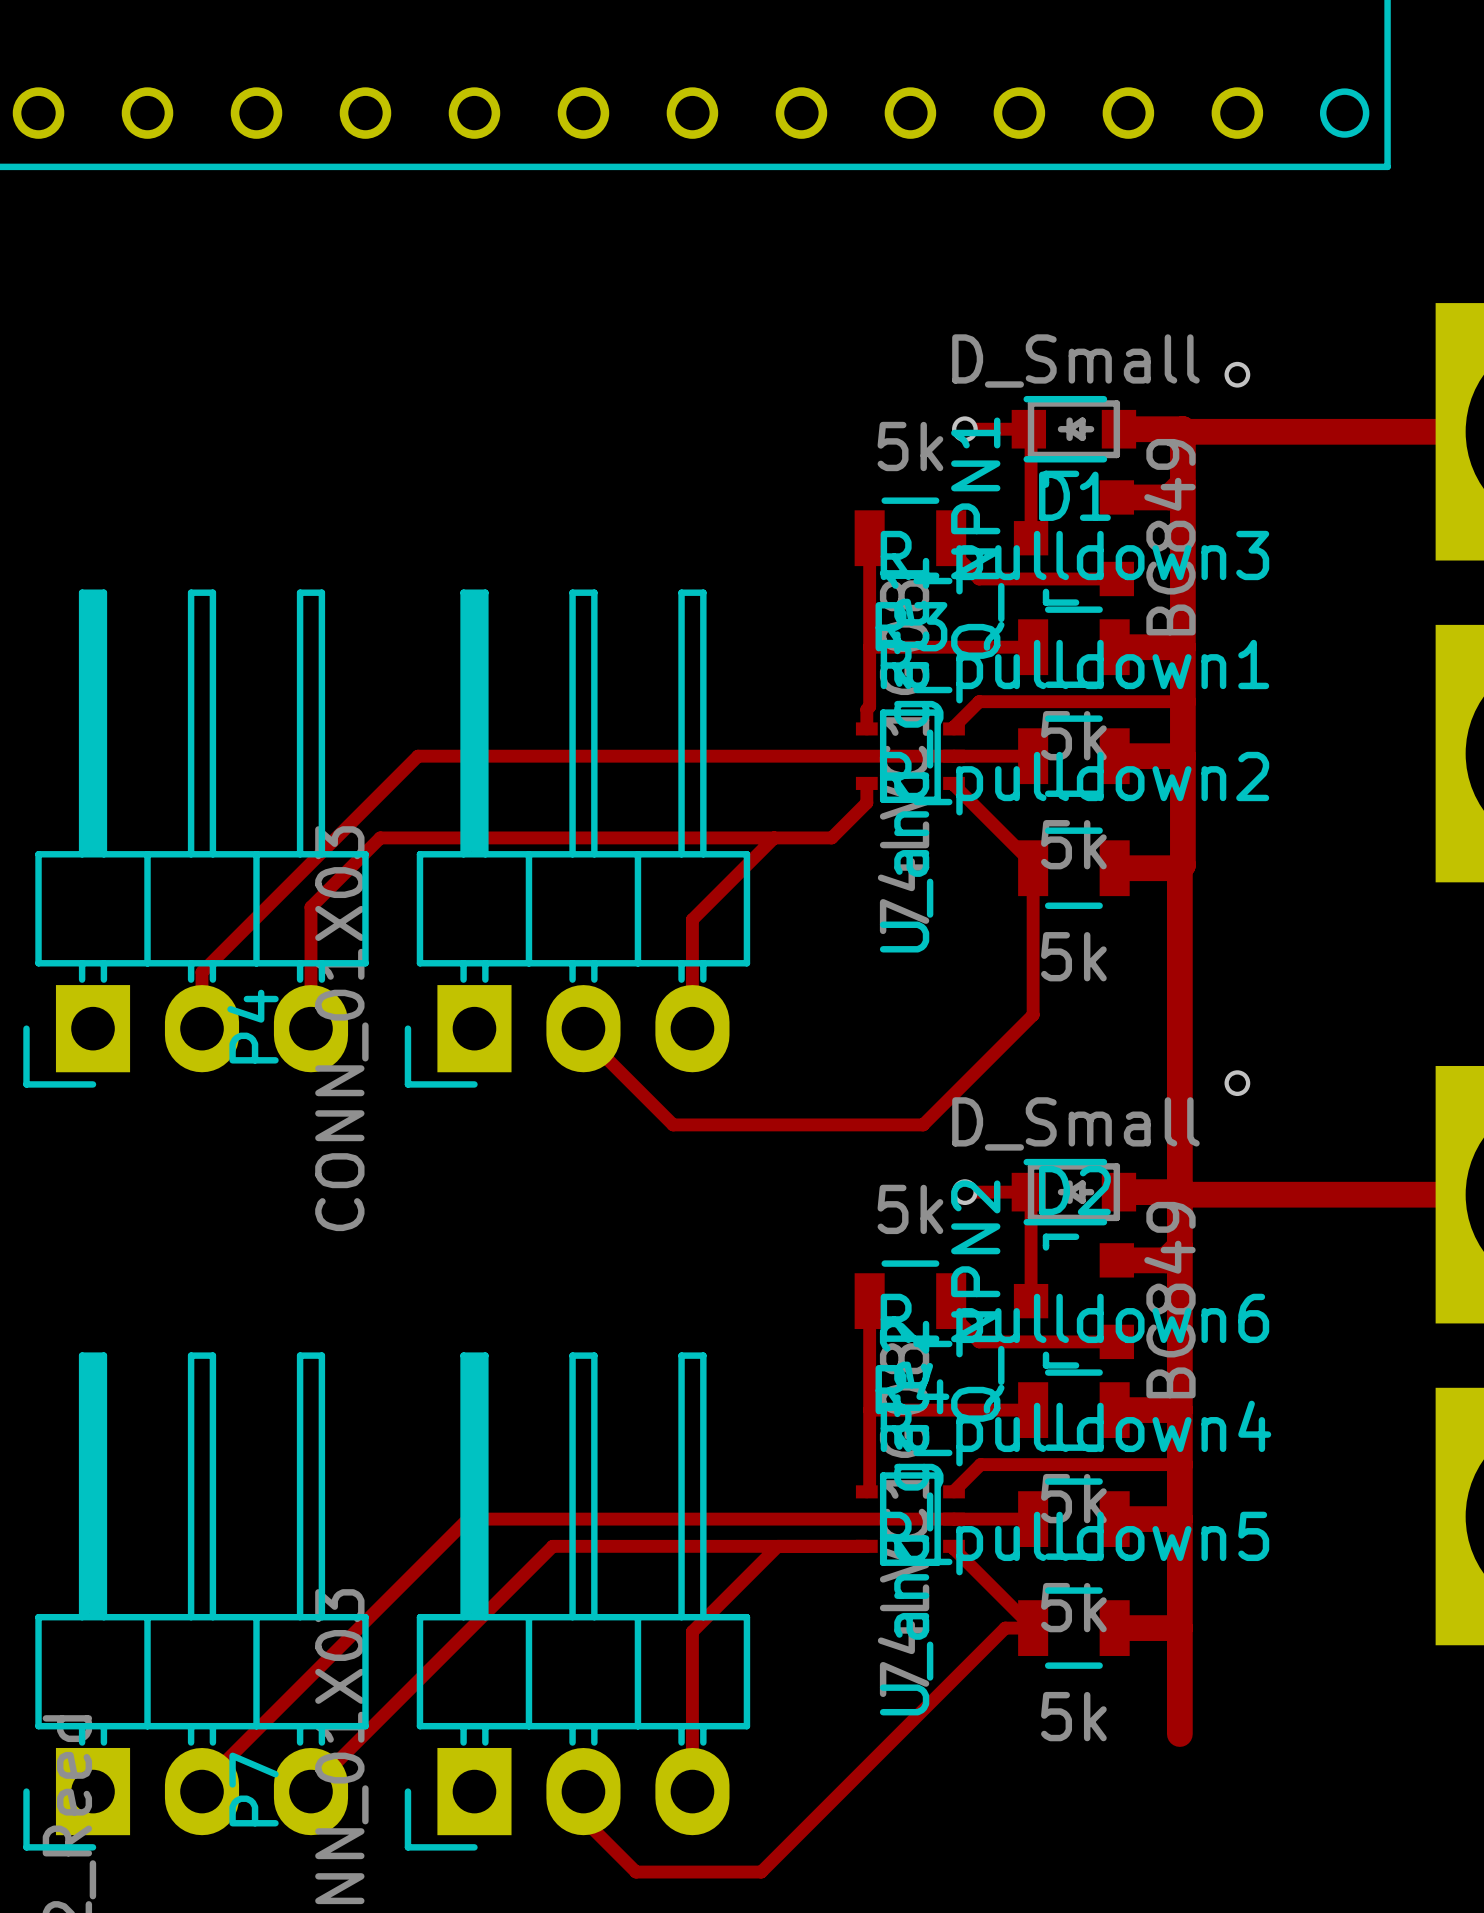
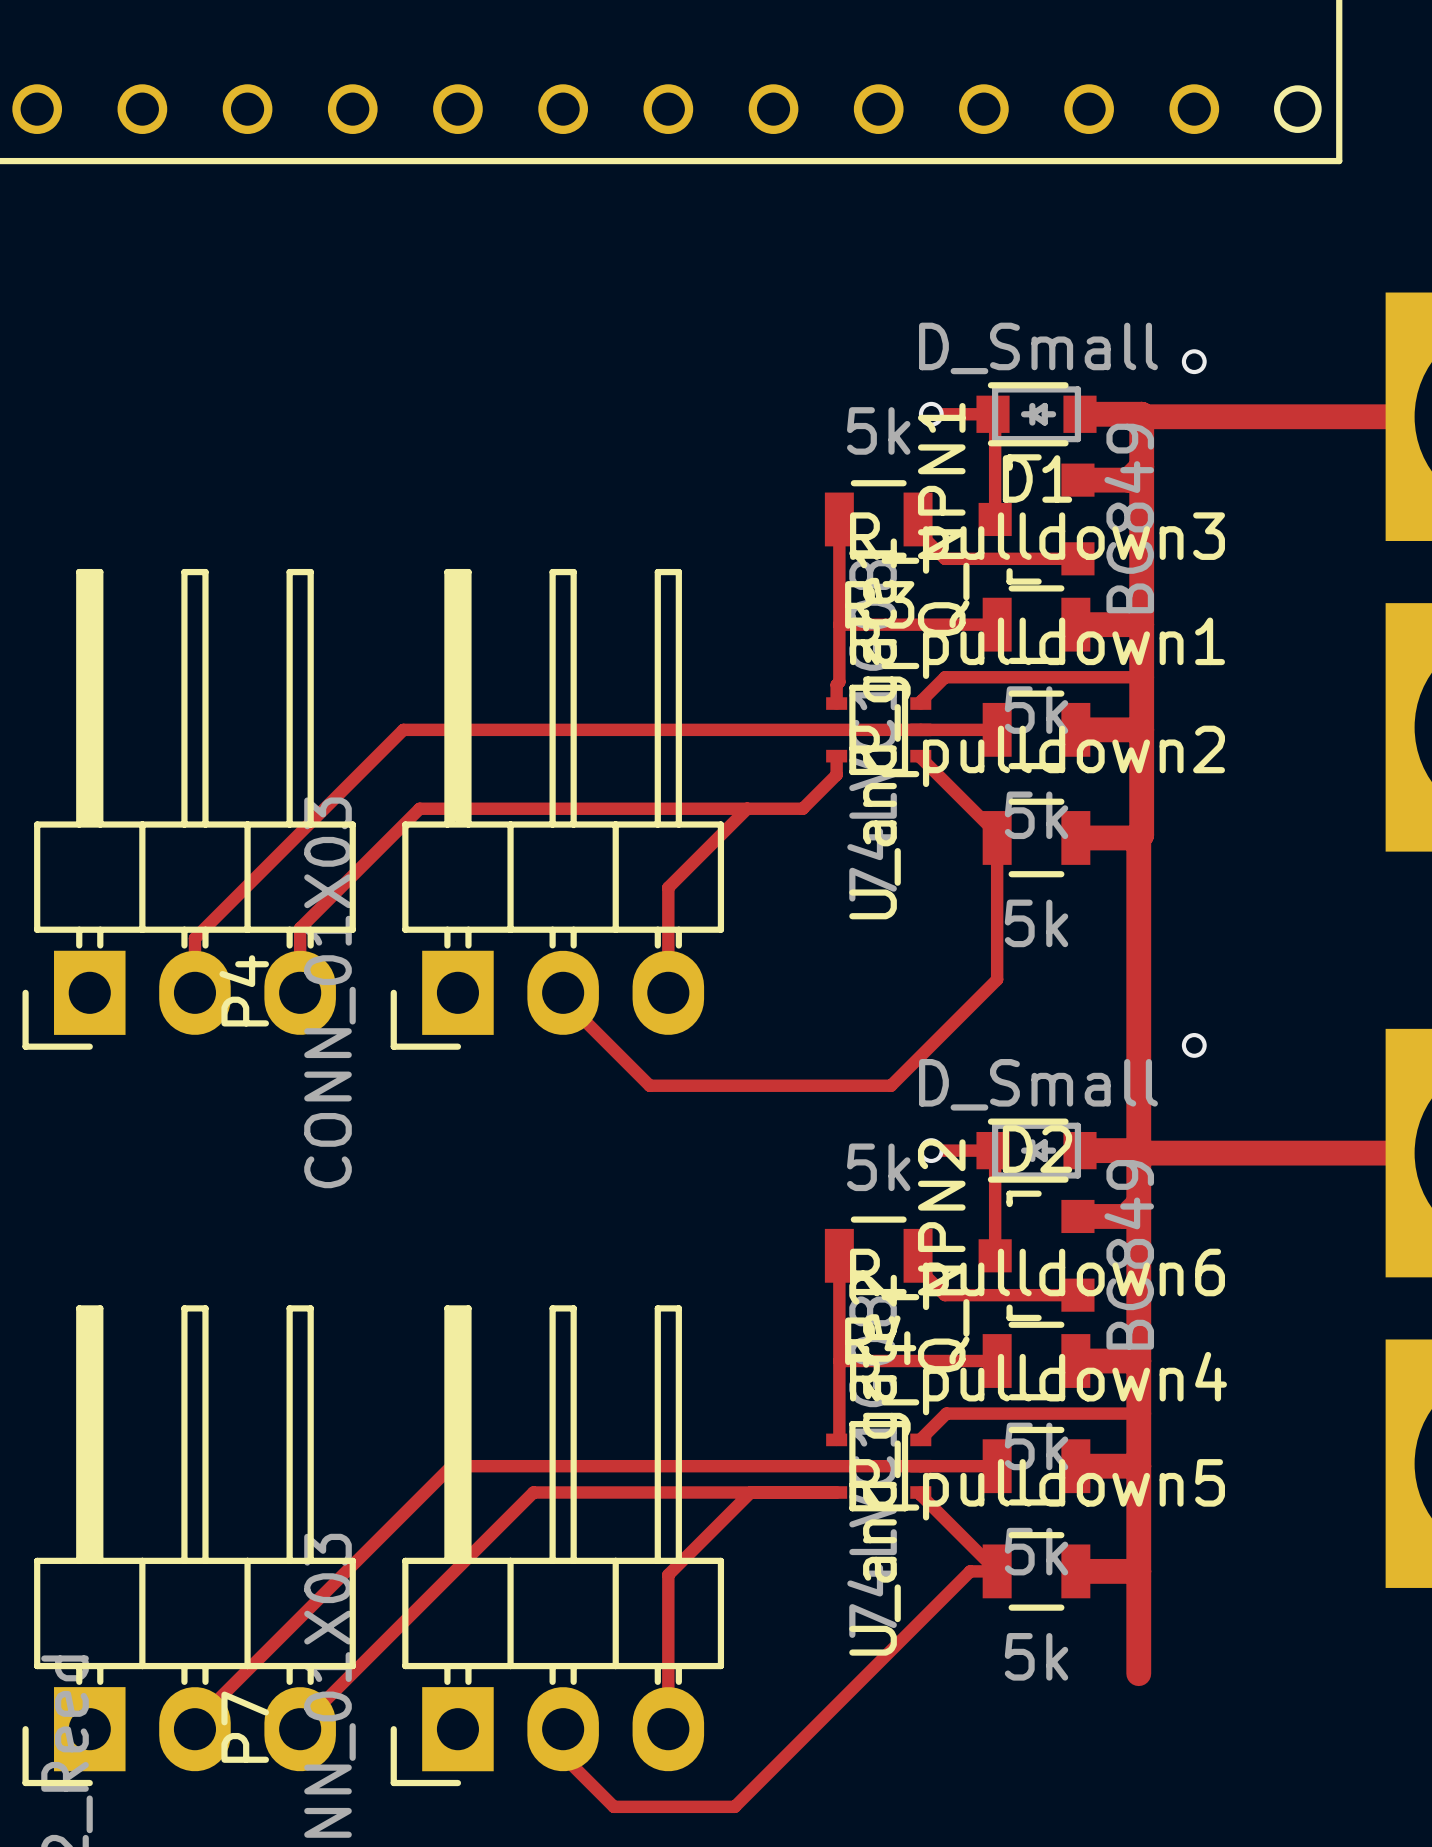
track: (434, 837) (380, 837) (310, 907) (310, 961) -> (419, 808) (300, 928)

